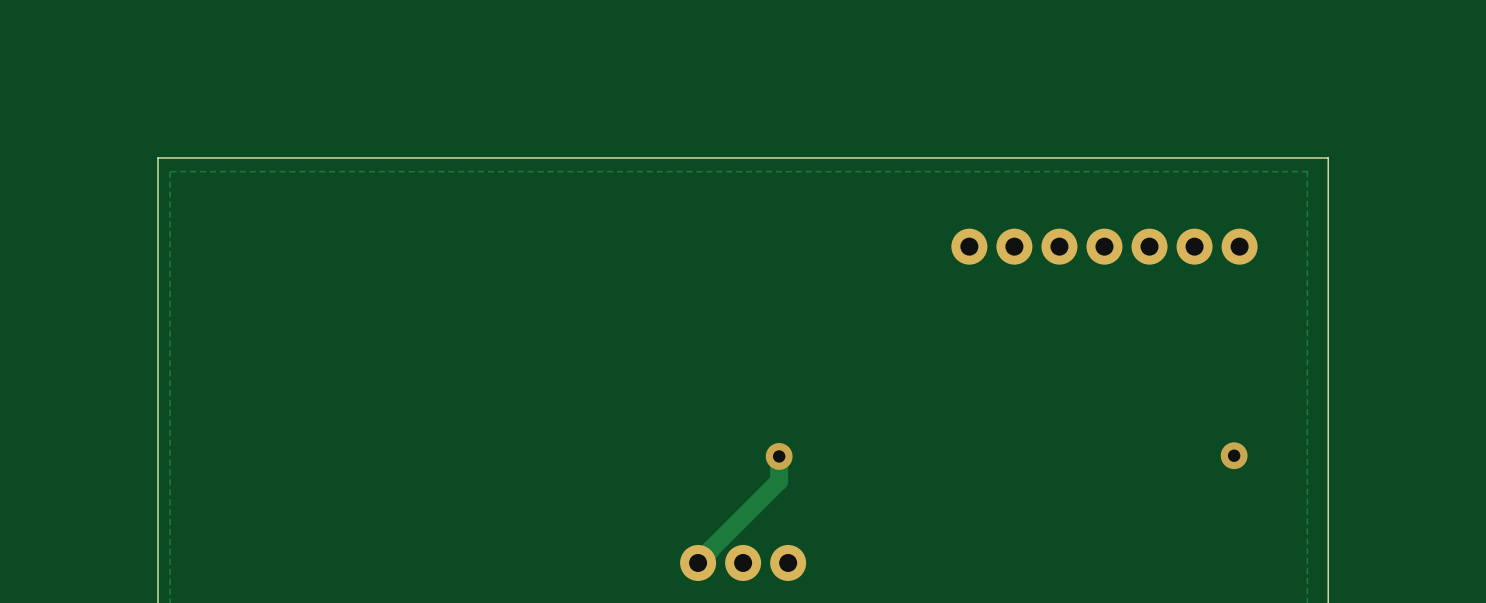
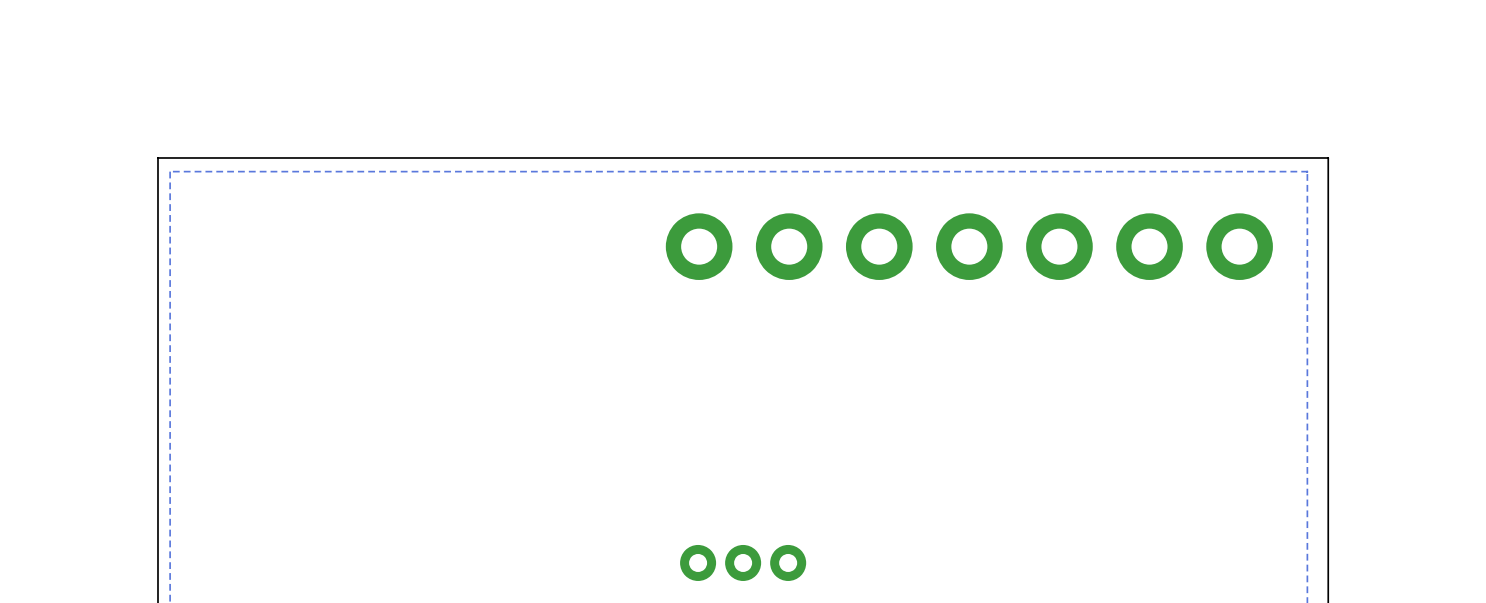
part: none -> (969, 246)
part: (1104, 246) -> none
via: (1234, 455) -> none
track: (779, 456) (779, 481) (698, 562) -> none
via: (779, 456) -> none

